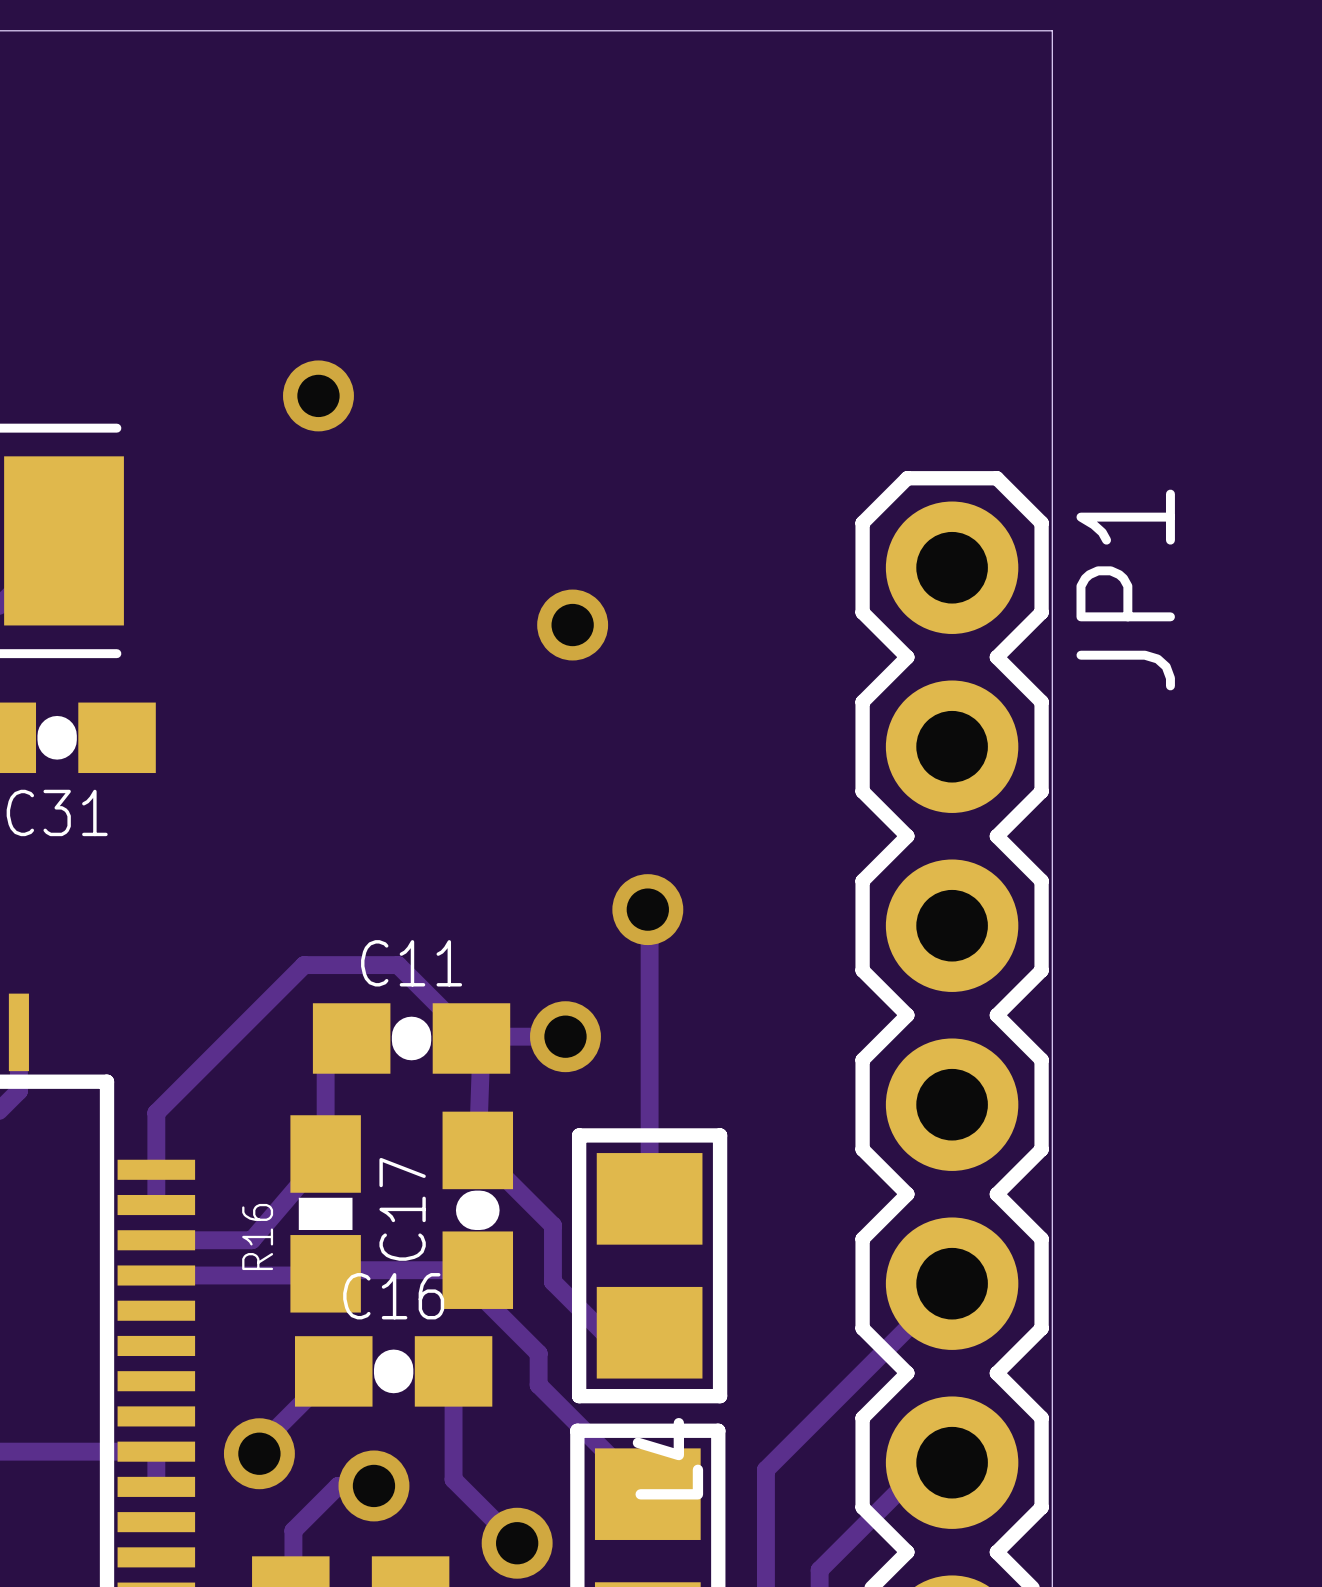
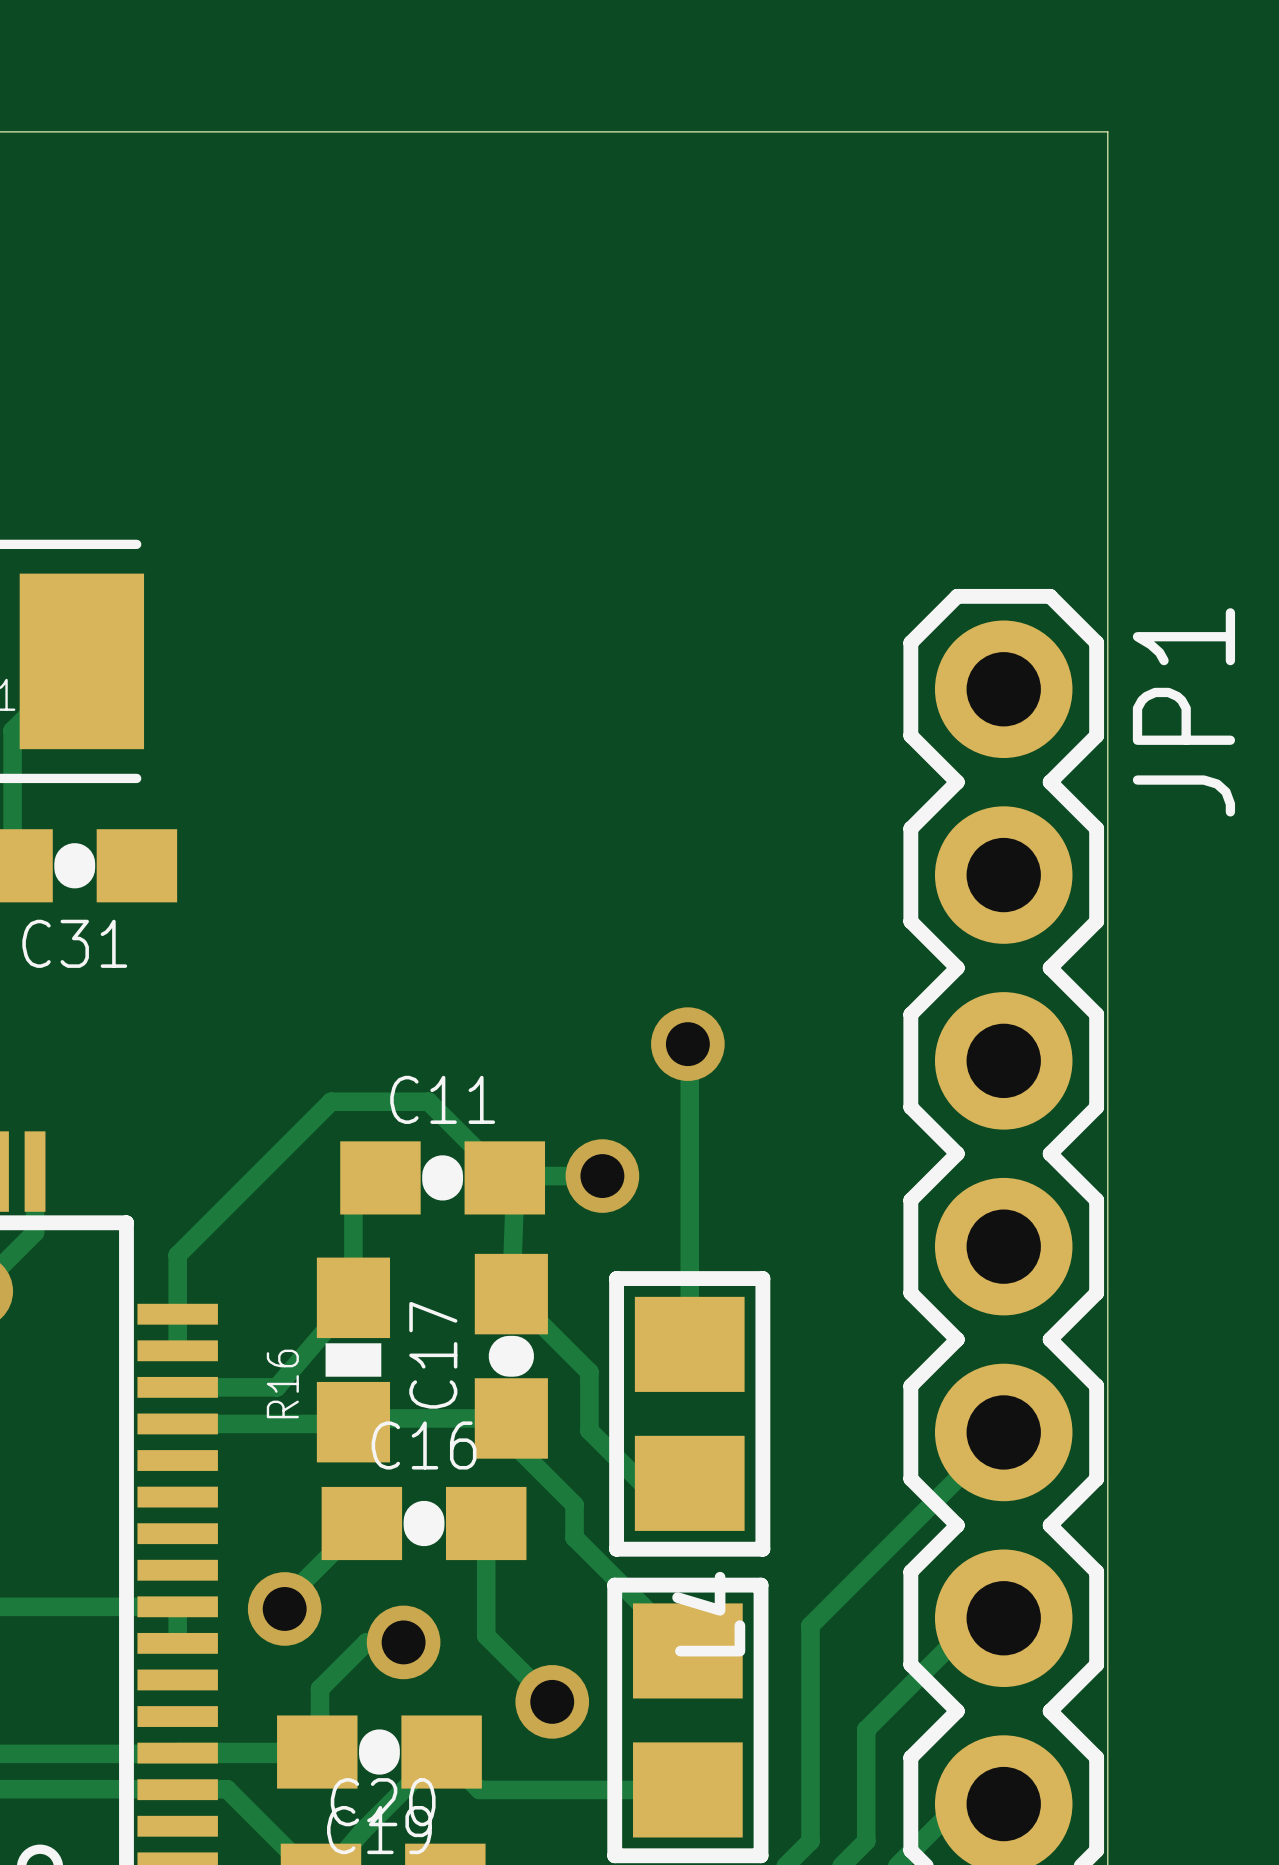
via: (318, 395) -> none
via: (572, 625) -> none

